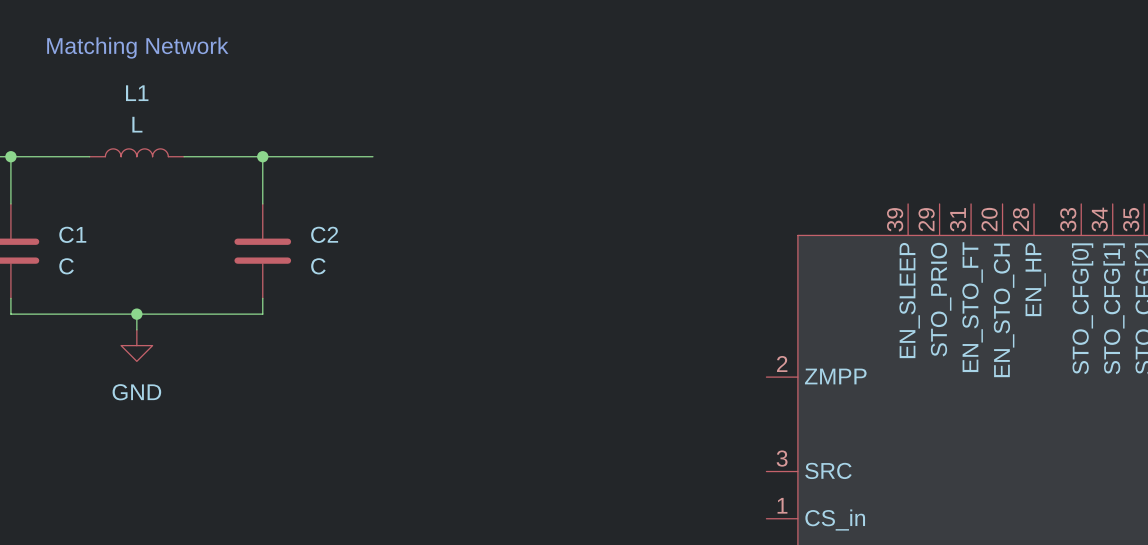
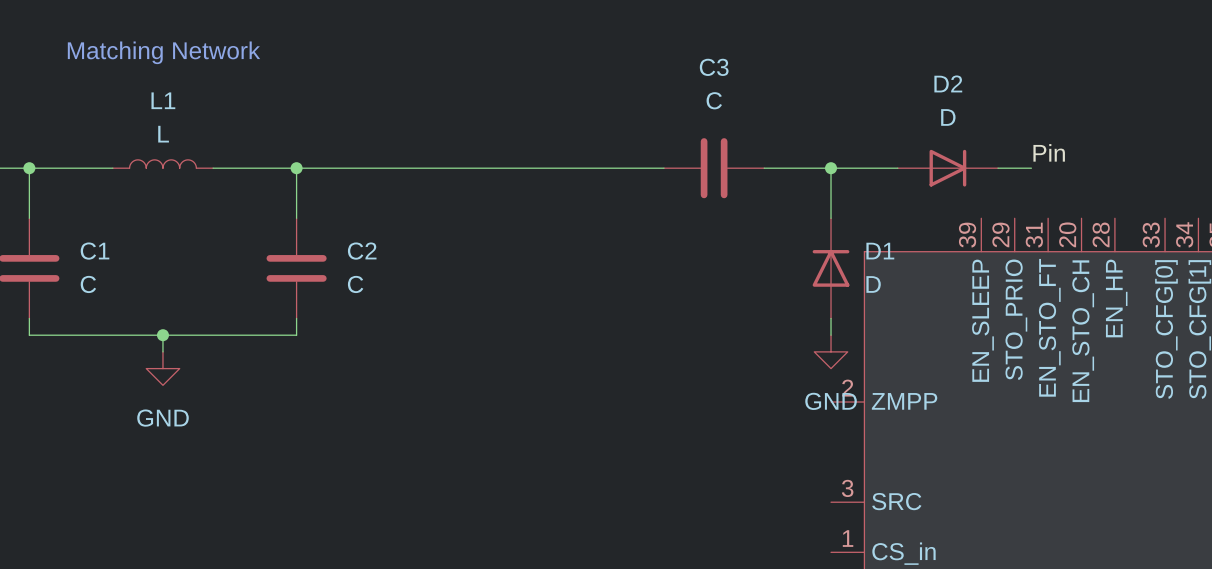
label: none -> Pin (1049, 152)
wire: none -> (413, 168) (664, 168)
C3: none -> C (714, 168)
wire: none -> (764, 168) (897, 168)
wire: none -> (831, 168) (831, 218)
junction: none -> (831, 168)
D2: none -> D (947, 168)
wire: none -> (998, 168) (1031, 168)
D1: none -> D (831, 268)
wire: none -> (831, 318) (831, 335)
power symbol: none -> GND (831, 351)

